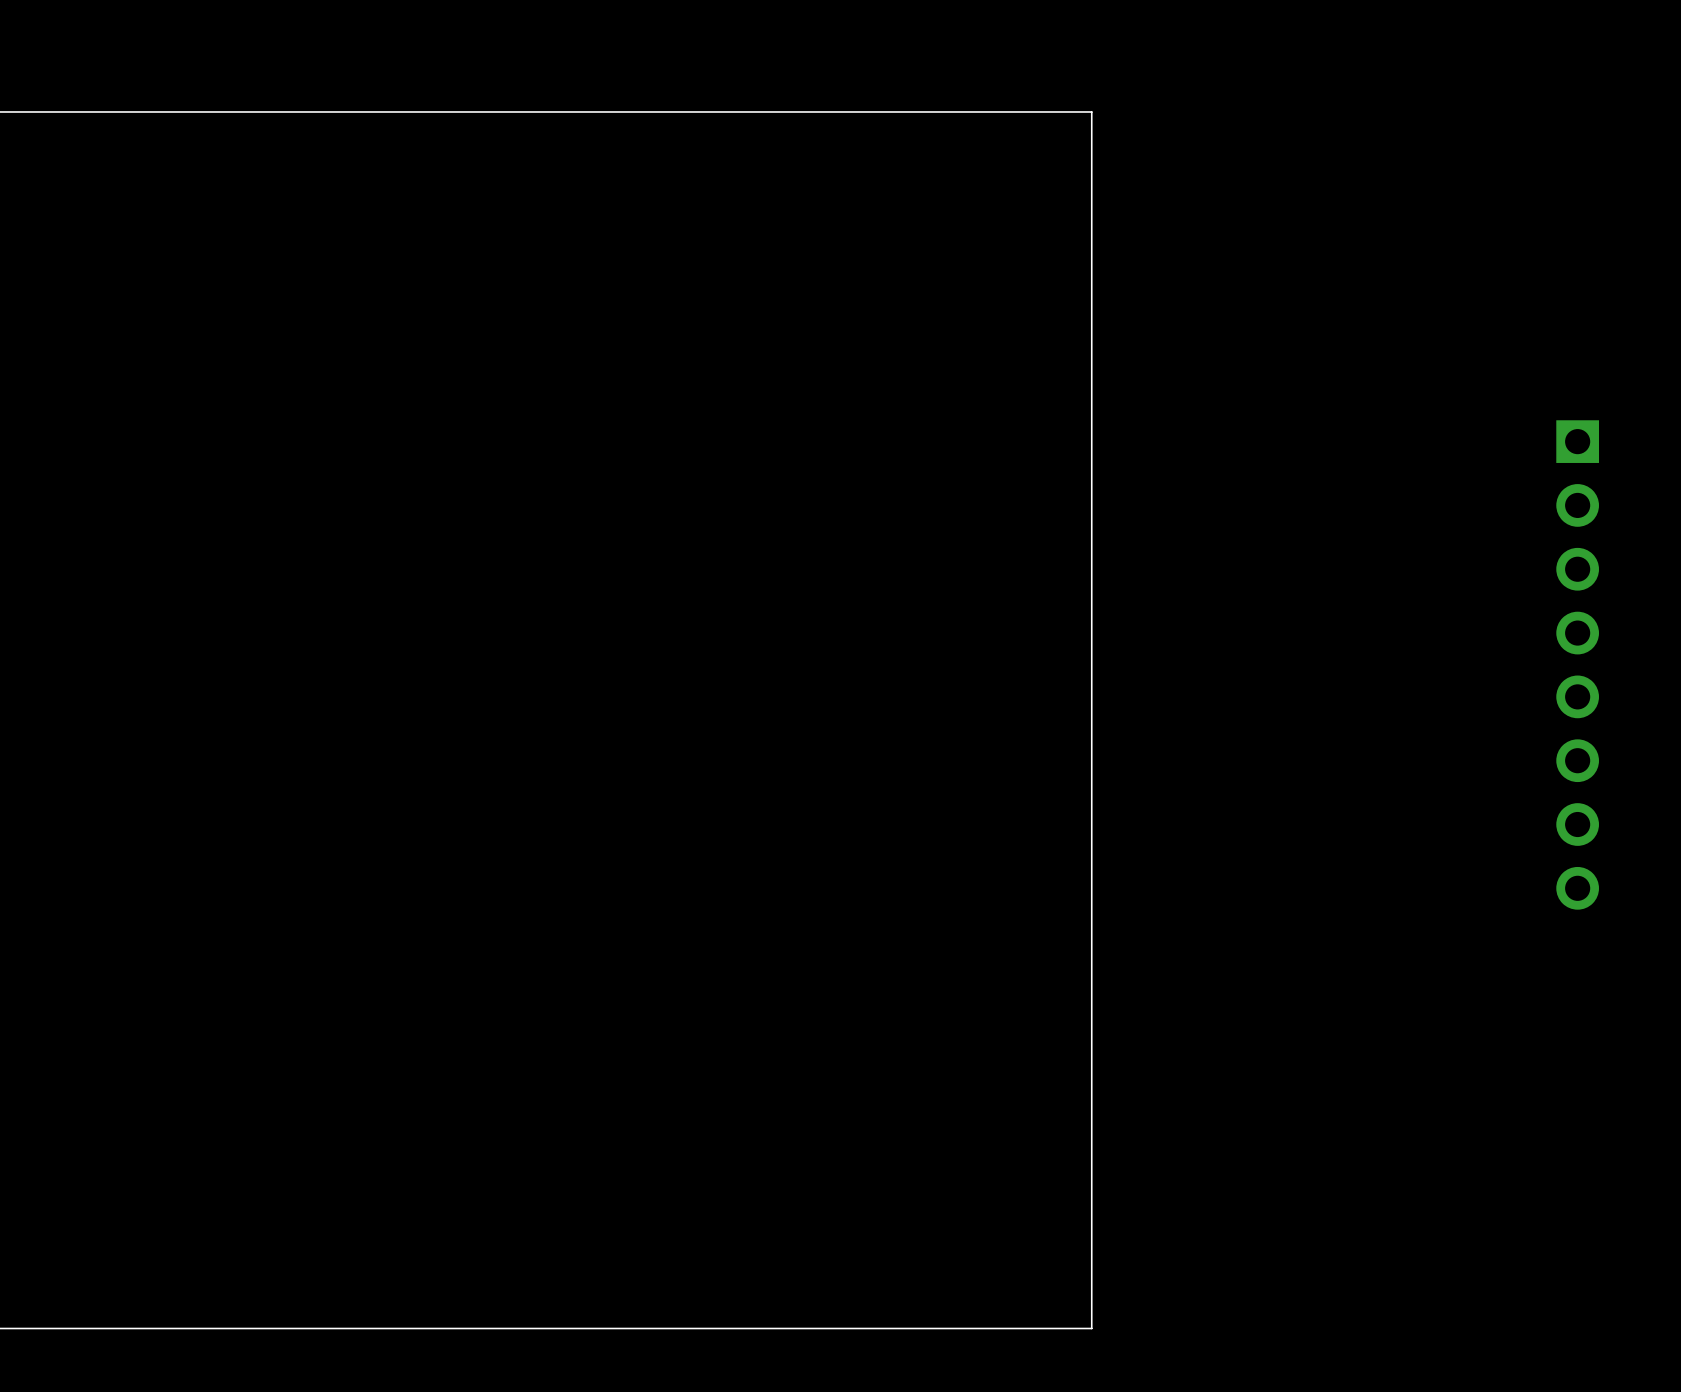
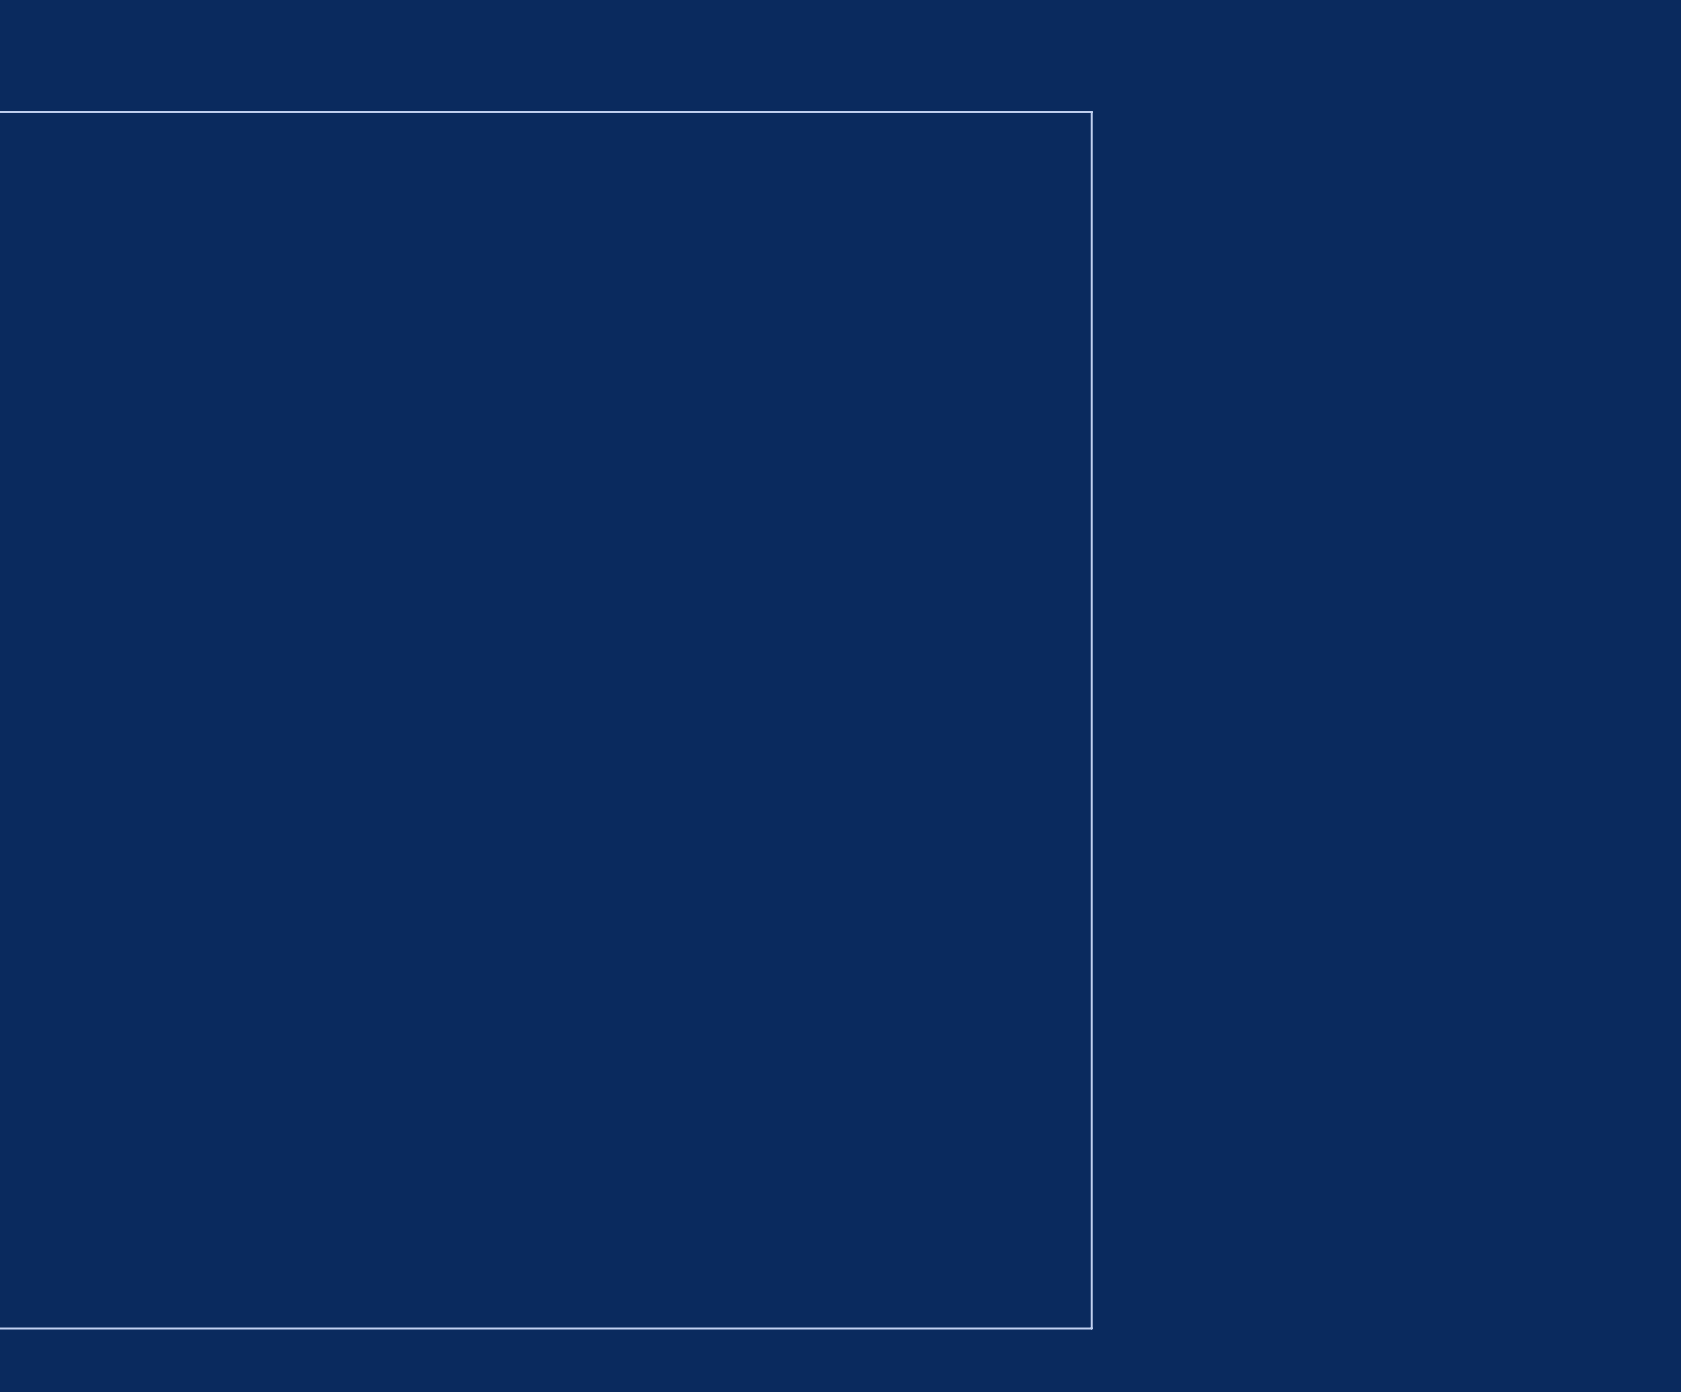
part: (1577, 664) -> none

